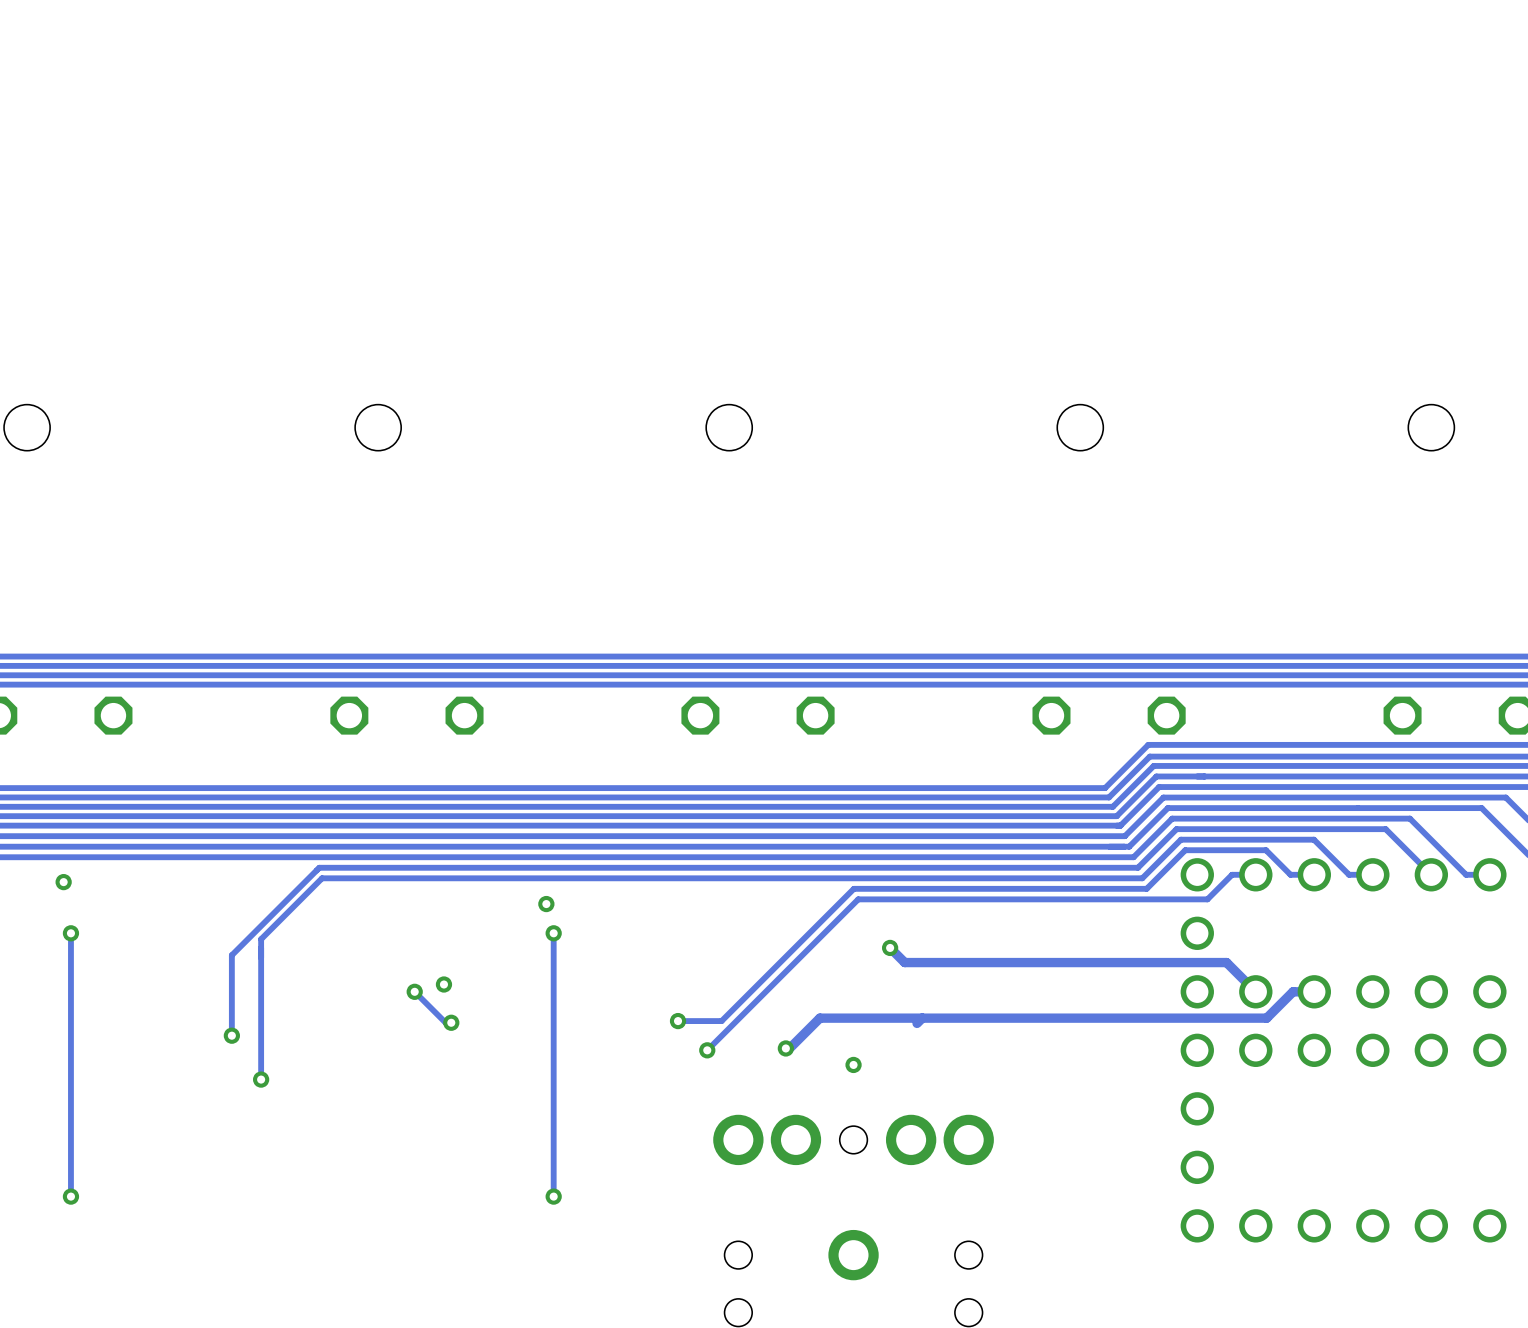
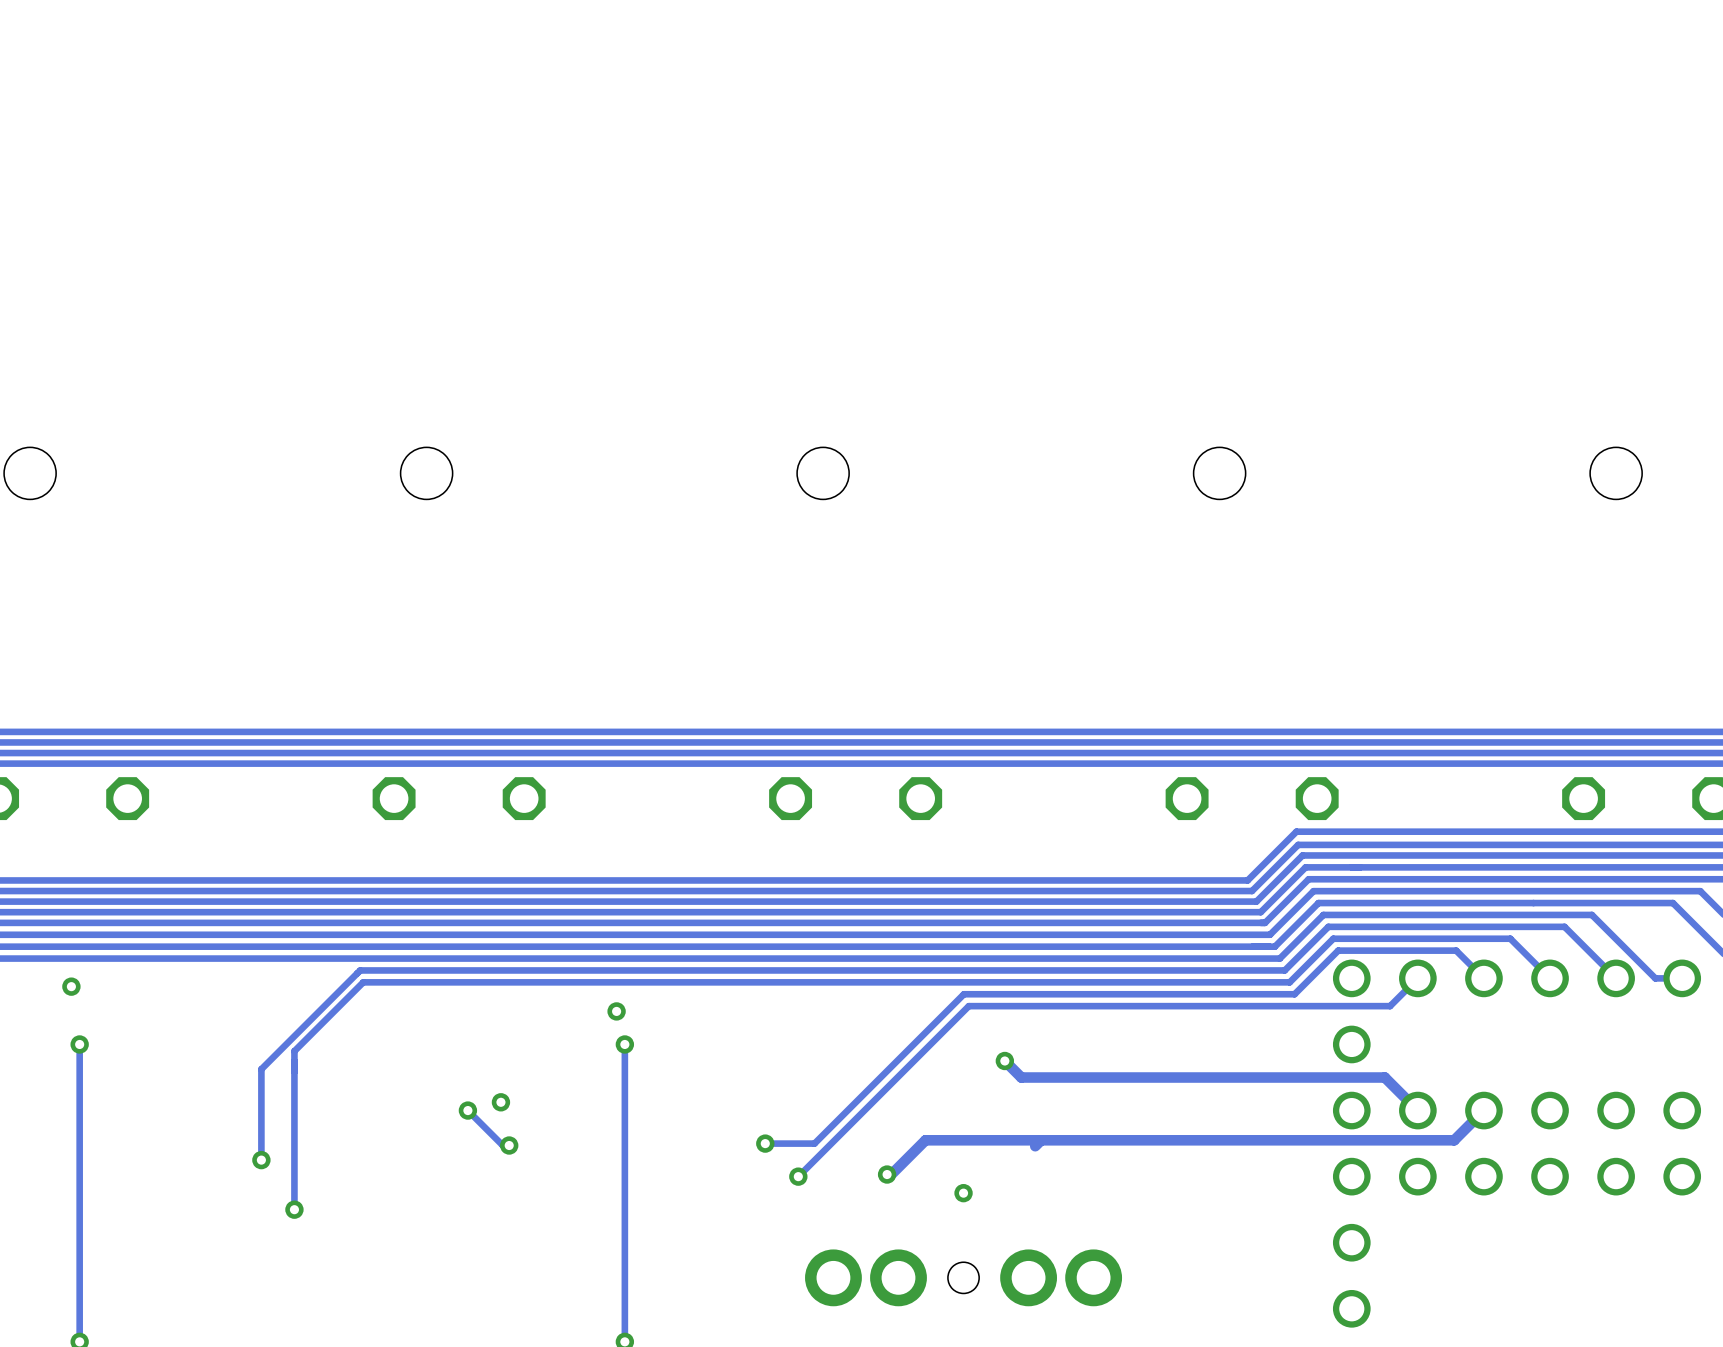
track: (1313, 839) (1349, 874) (1372, 874) -> (1483, 938) (1510, 938) (1550, 978)
track: (1265, 850) (1290, 874) (1314, 874) -> (1429, 950) (1456, 950) (1483, 978)
track: (1255, 874) (1232, 874) (1207, 899) -> (1417, 978) (1390, 1006) (1363, 1006)
track: (1314, 991) (1293, 991) (1266, 1018) -> (1483, 1110) (1454, 1140) (1430, 1140)

